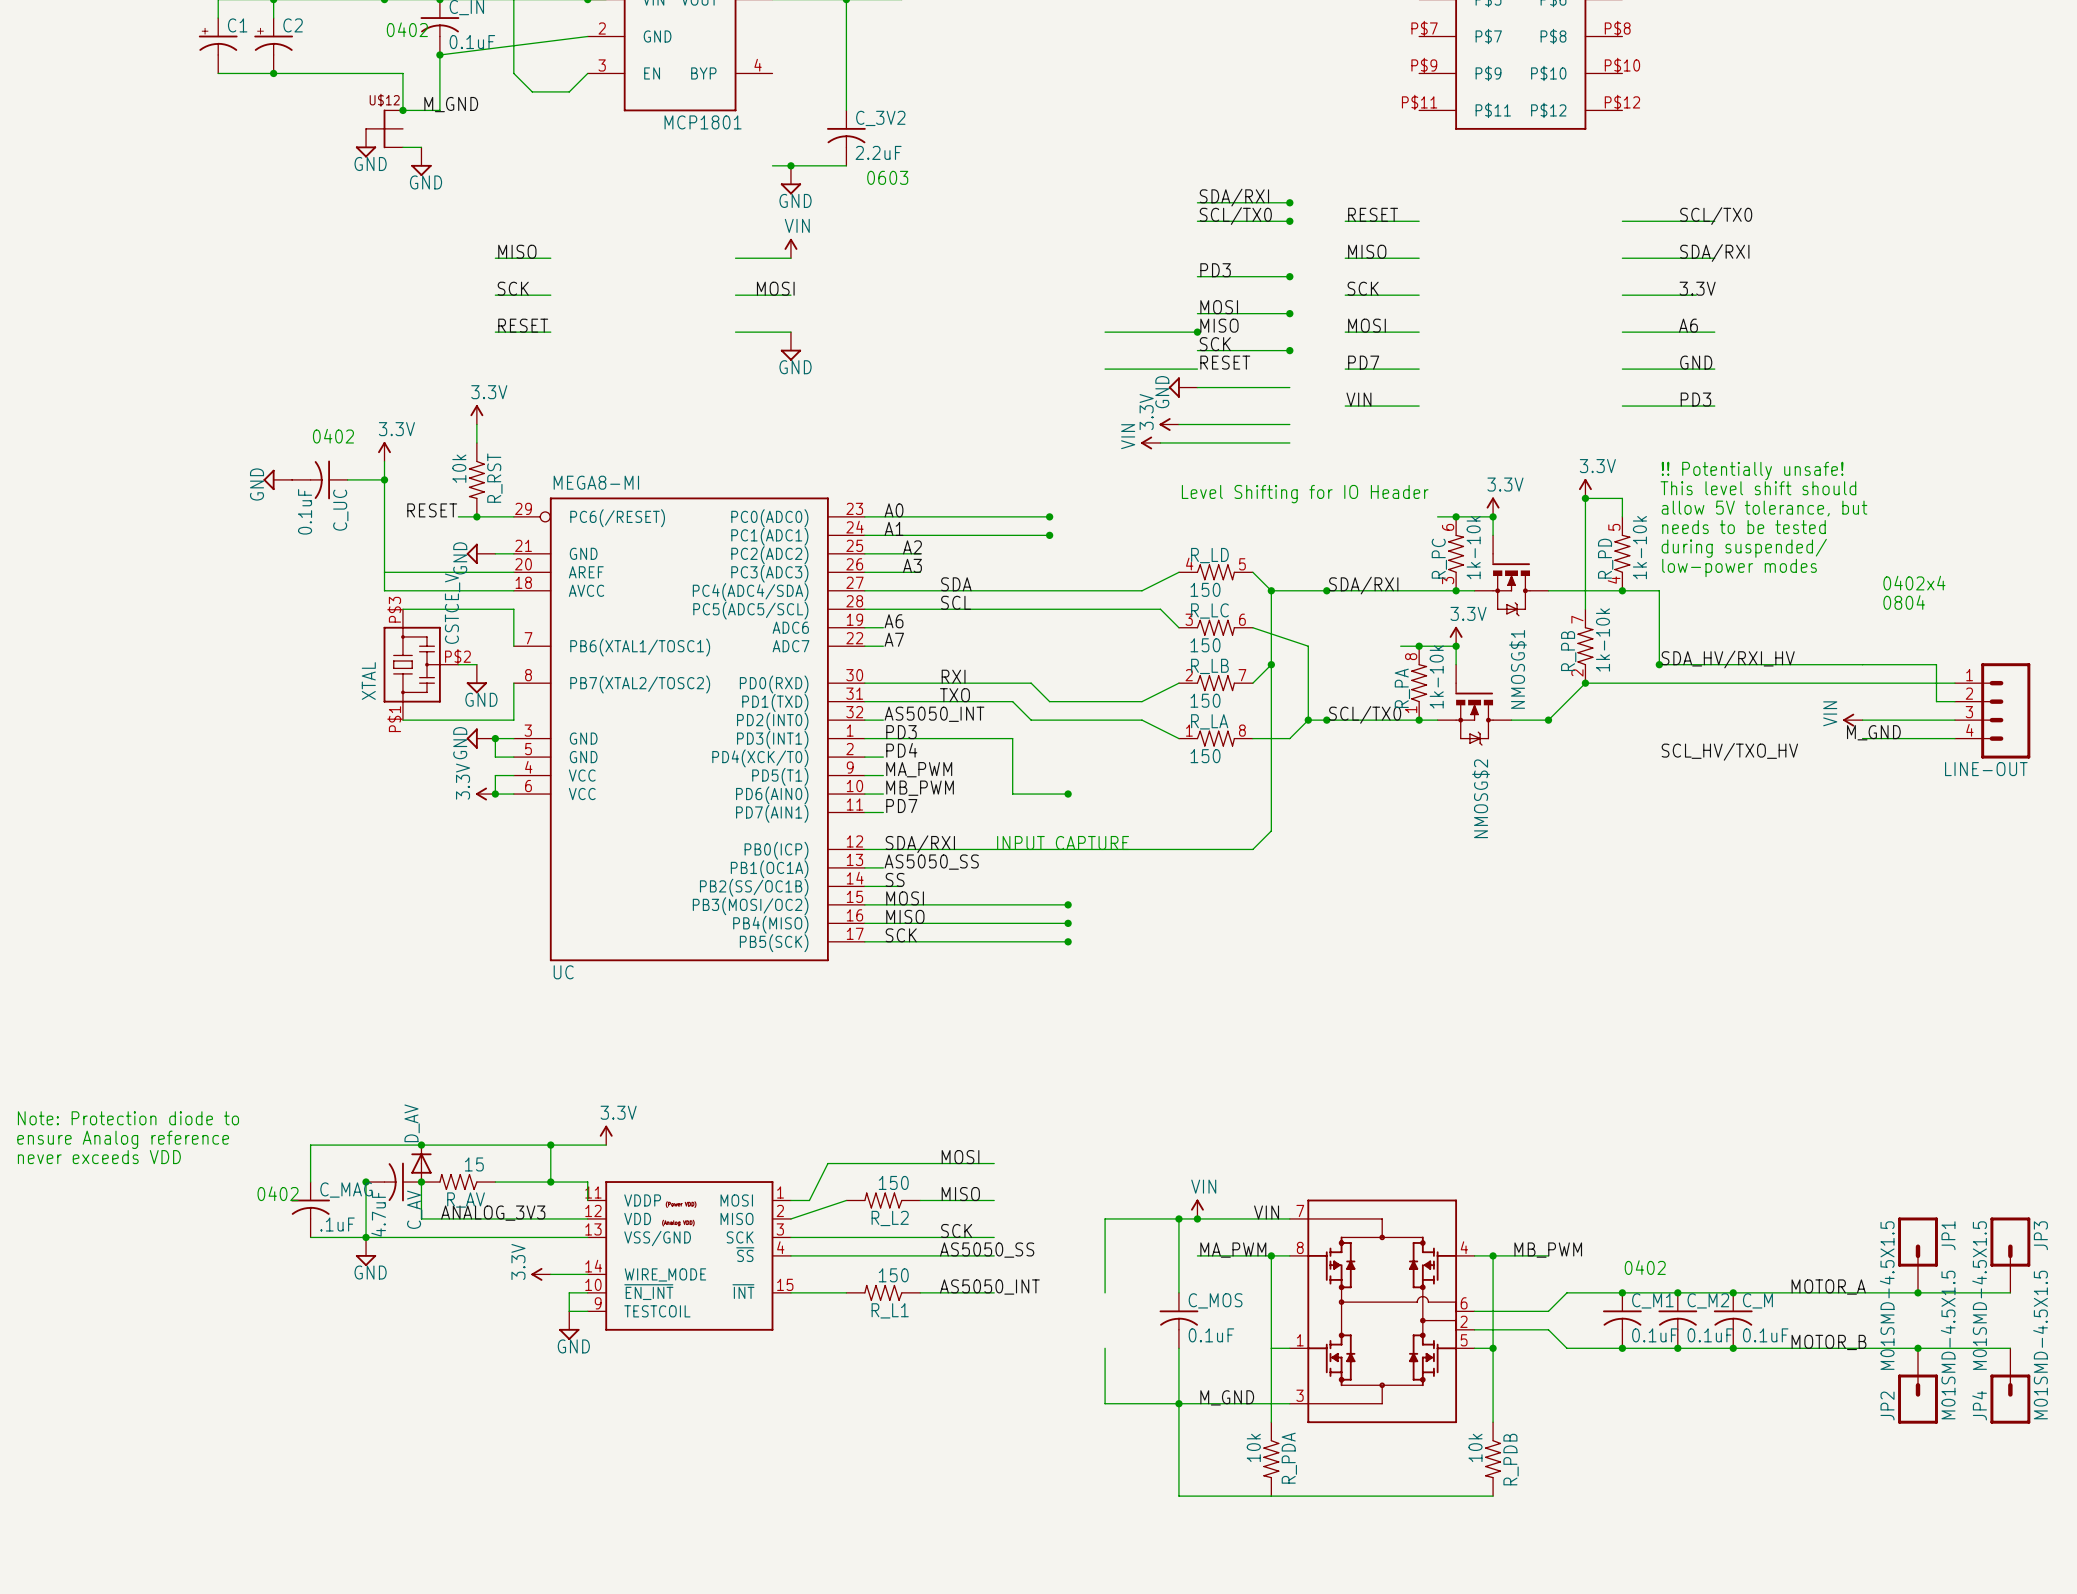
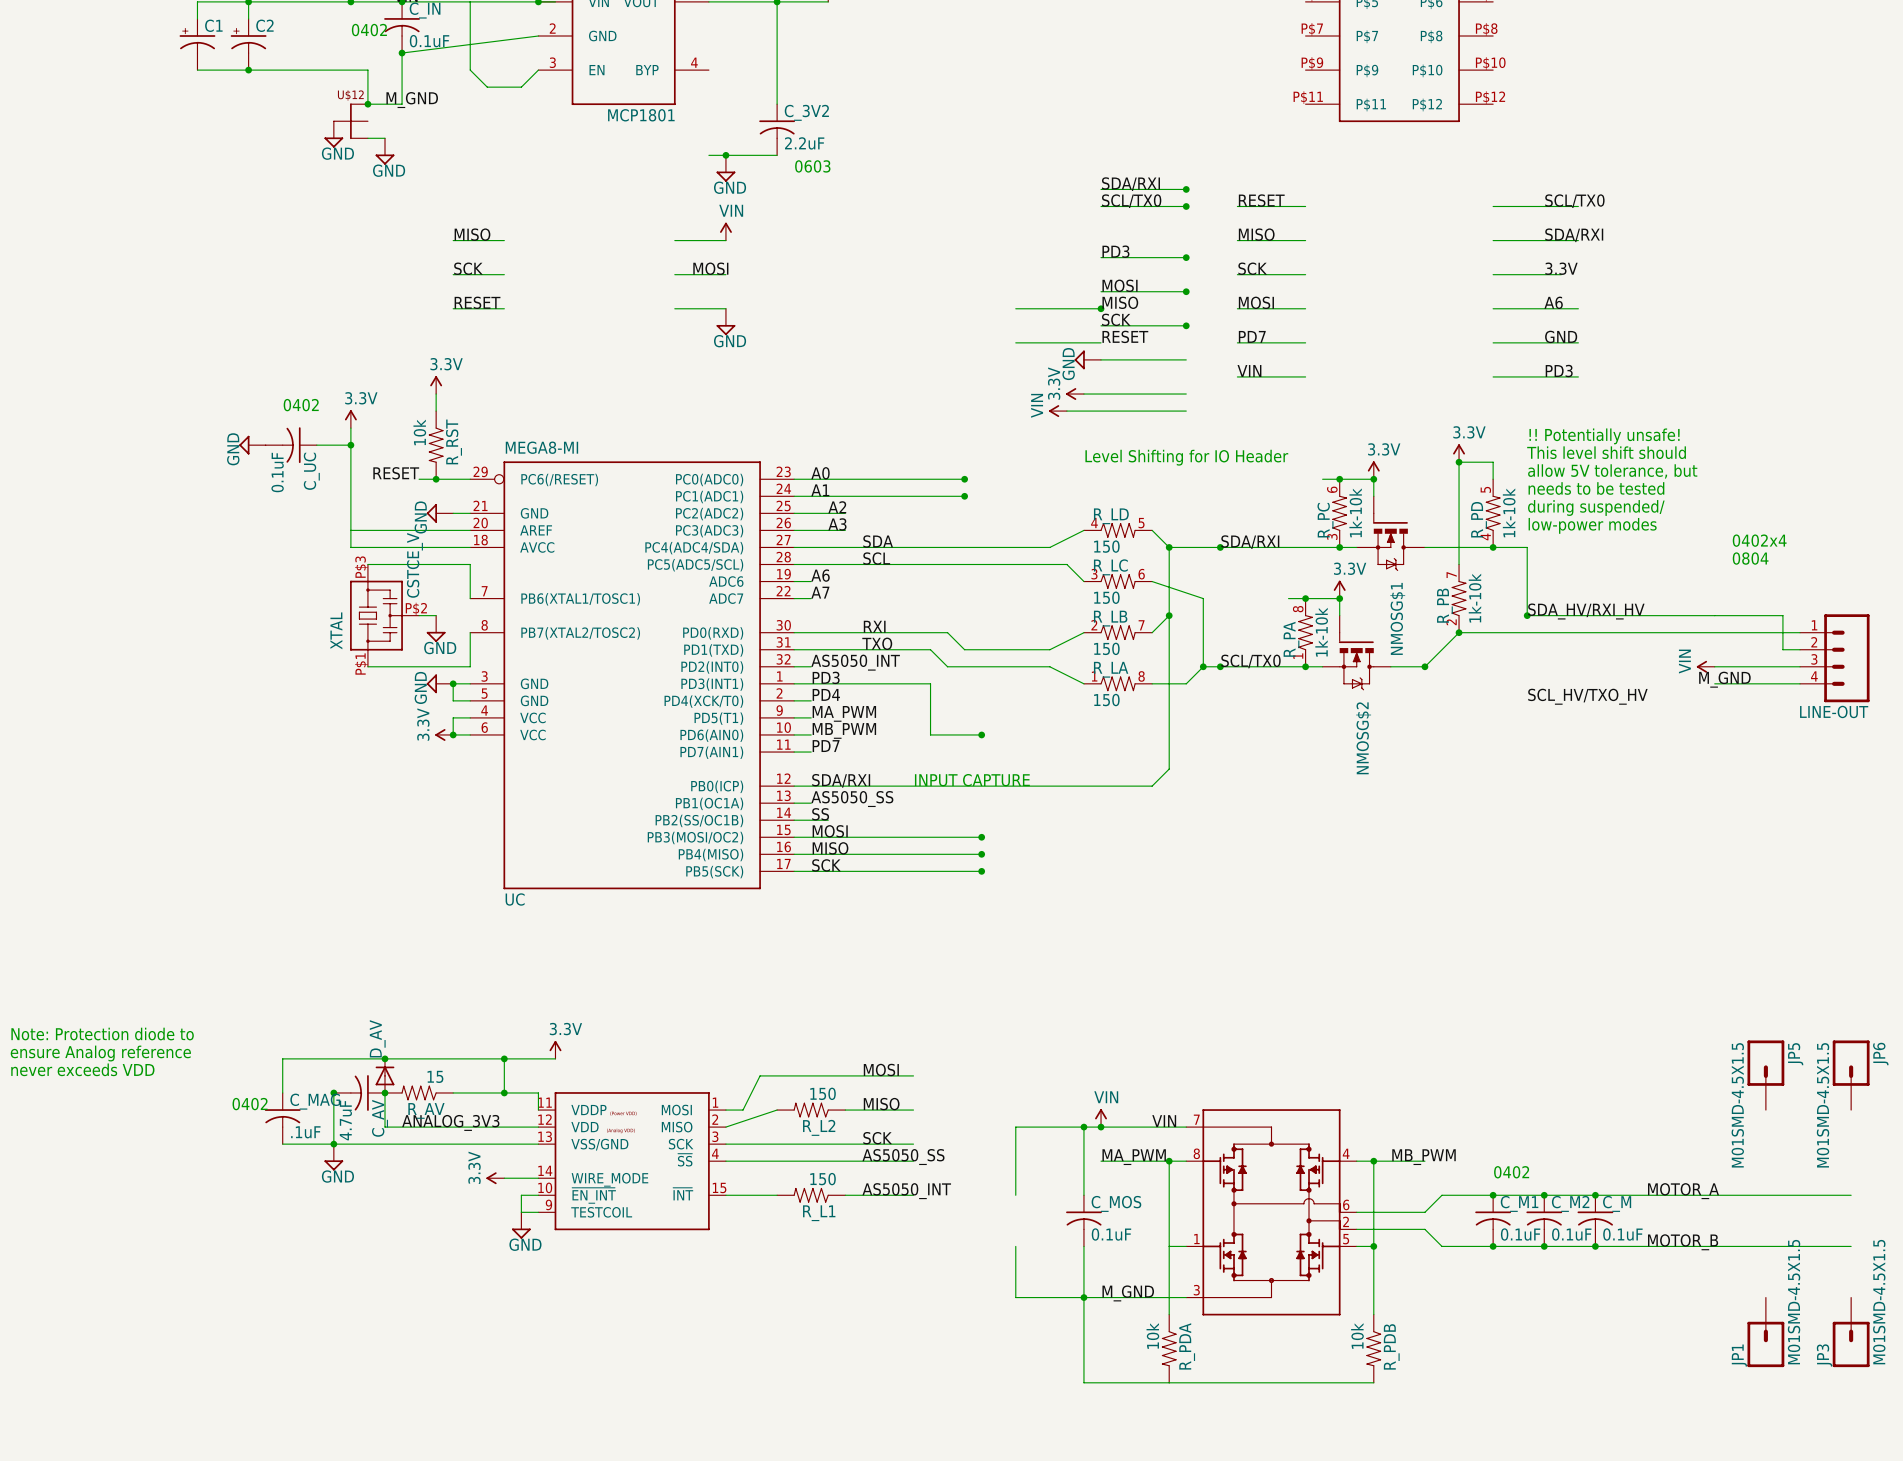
JP5: none -> M01SMD-4.5X1.5 (1765, 1075)
JP6: none -> M01SMD-4.5X1.5 (1851, 1075)
JP1 rotation: 0° (1918, 1242) -> 180° (1765, 1344)
JP3 rotation: 0° (2010, 1242) -> 180° (1851, 1344)
JP1 position: (1918, 1255) -> (1765, 1332)
JP3 position: (2010, 1255) -> (1851, 1332)
junction: (1918, 1292) -> none
junction: (1918, 1348) -> none
JP2: M01SMD-4.5X1.5 (1918, 1385) -> none
JP4: M01SMD-4.5X1.5 (2010, 1385) -> none

